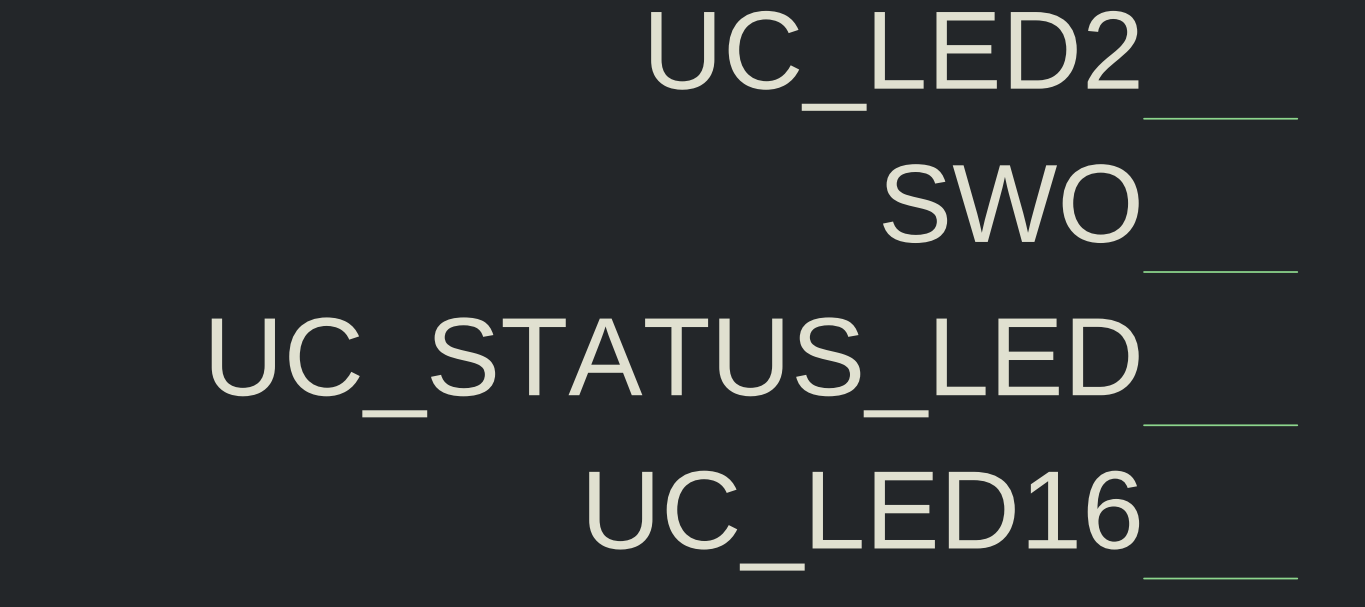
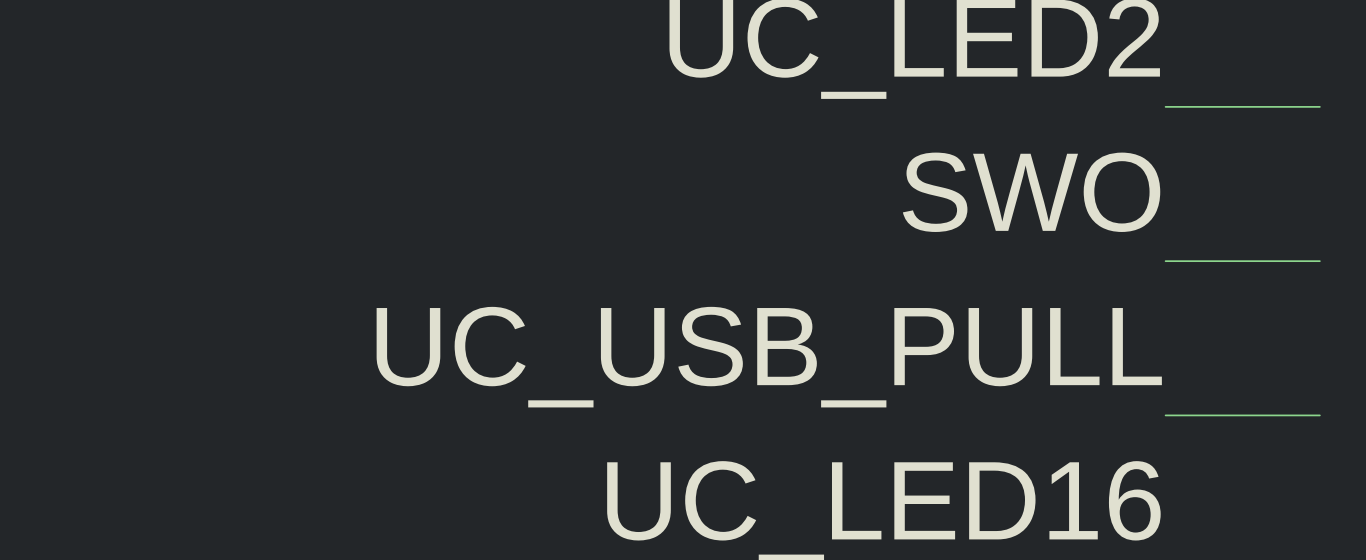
label: UC_STATUS_LED (675, 367) -> UC_USB_PULL (769, 357)

